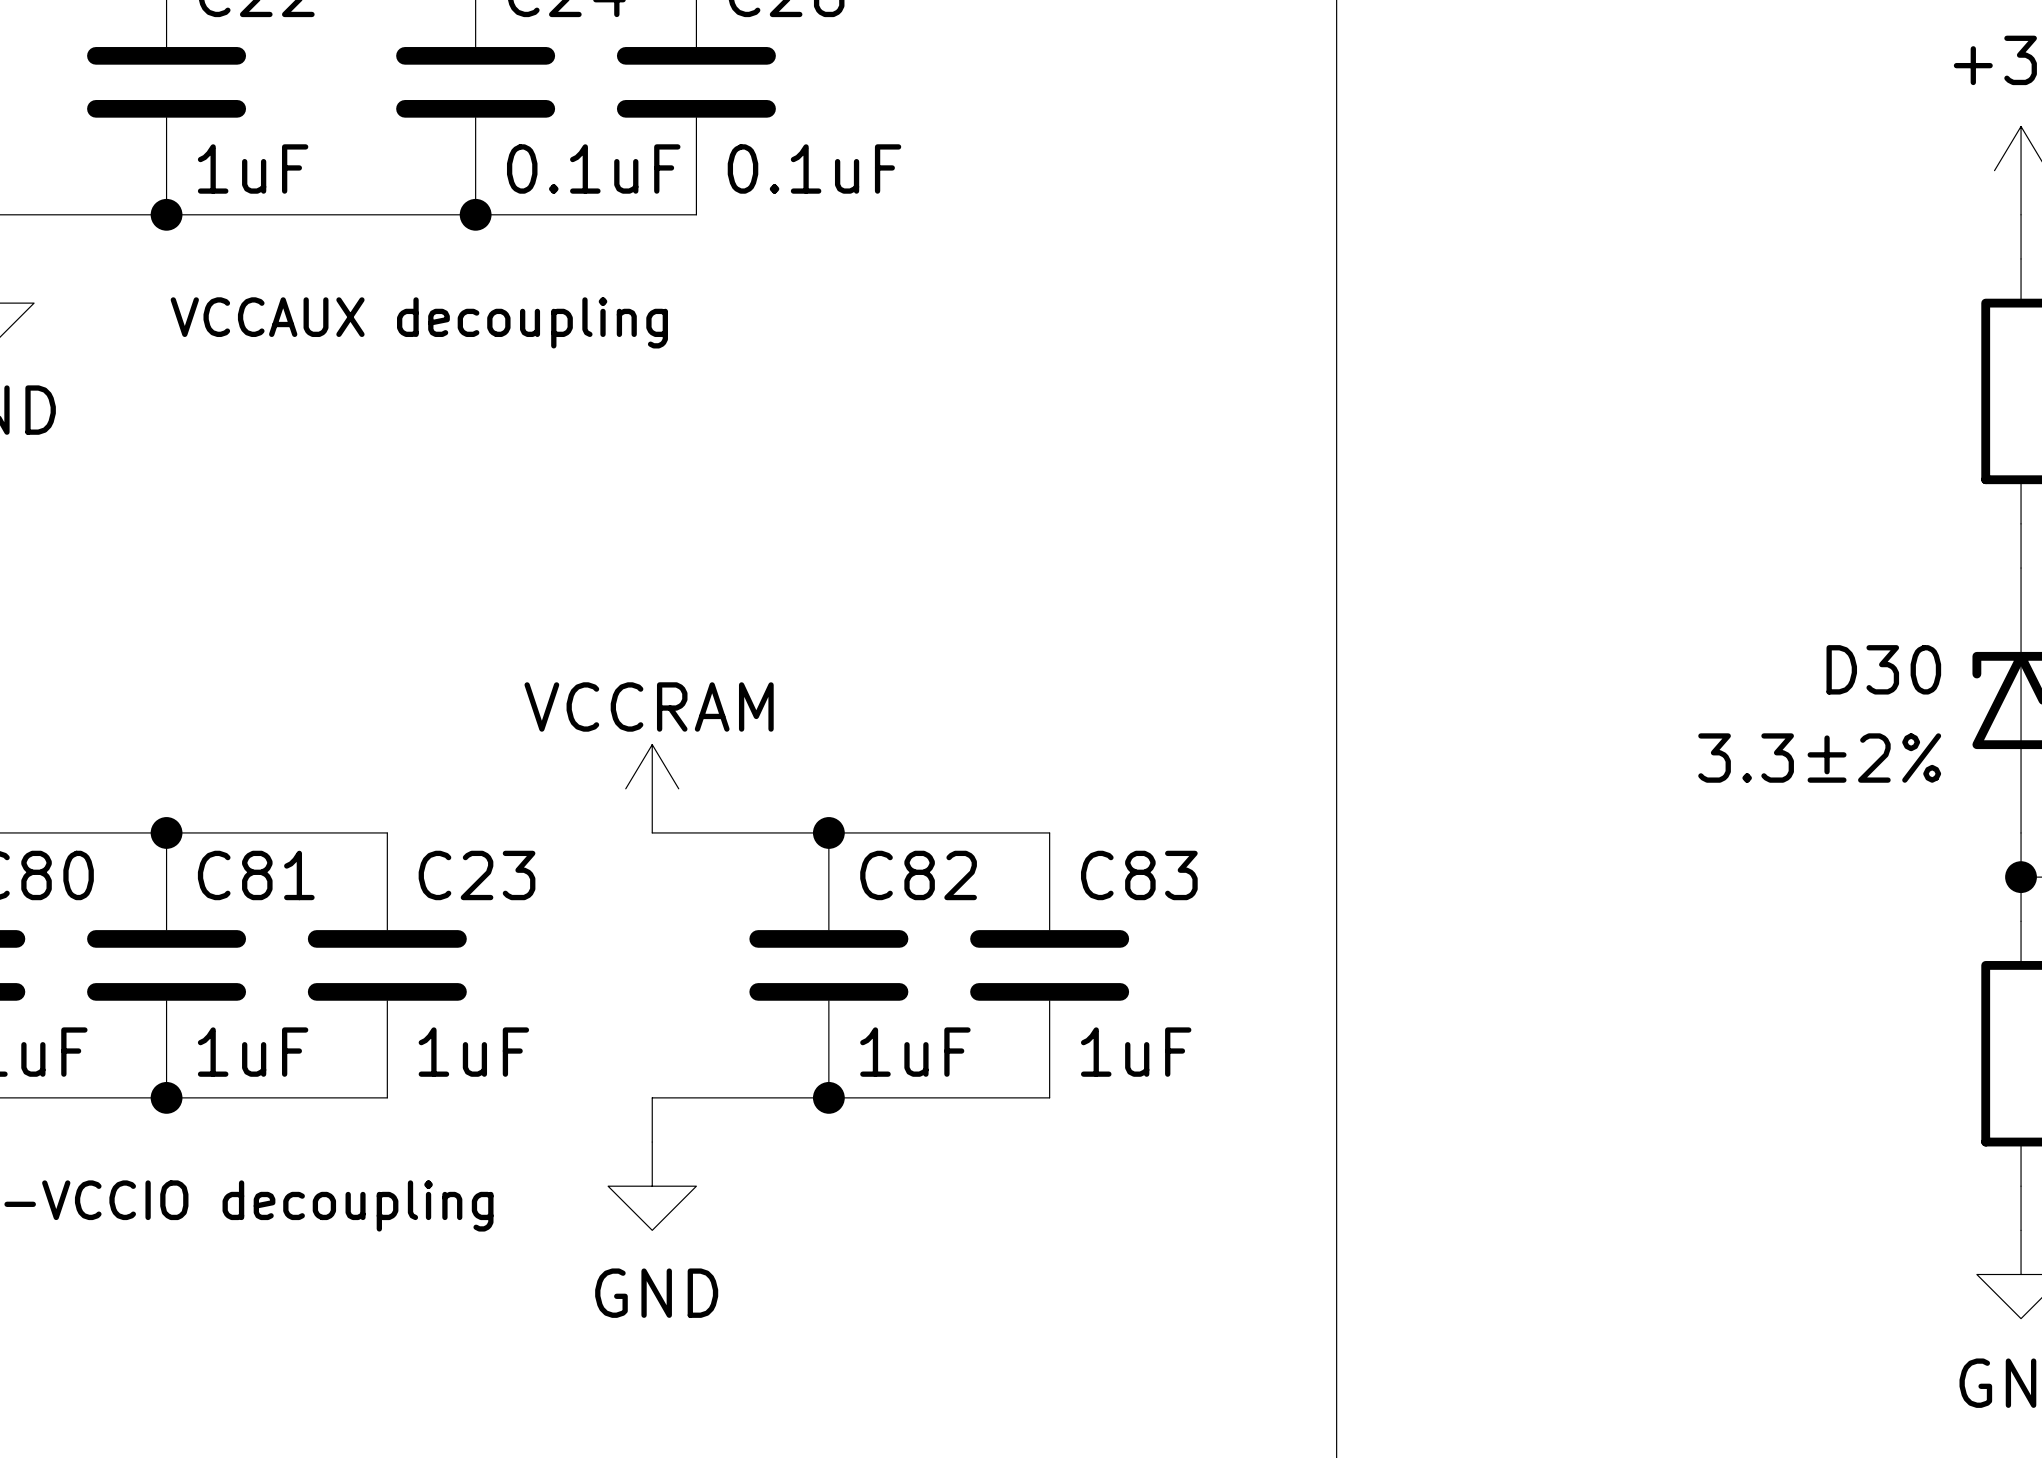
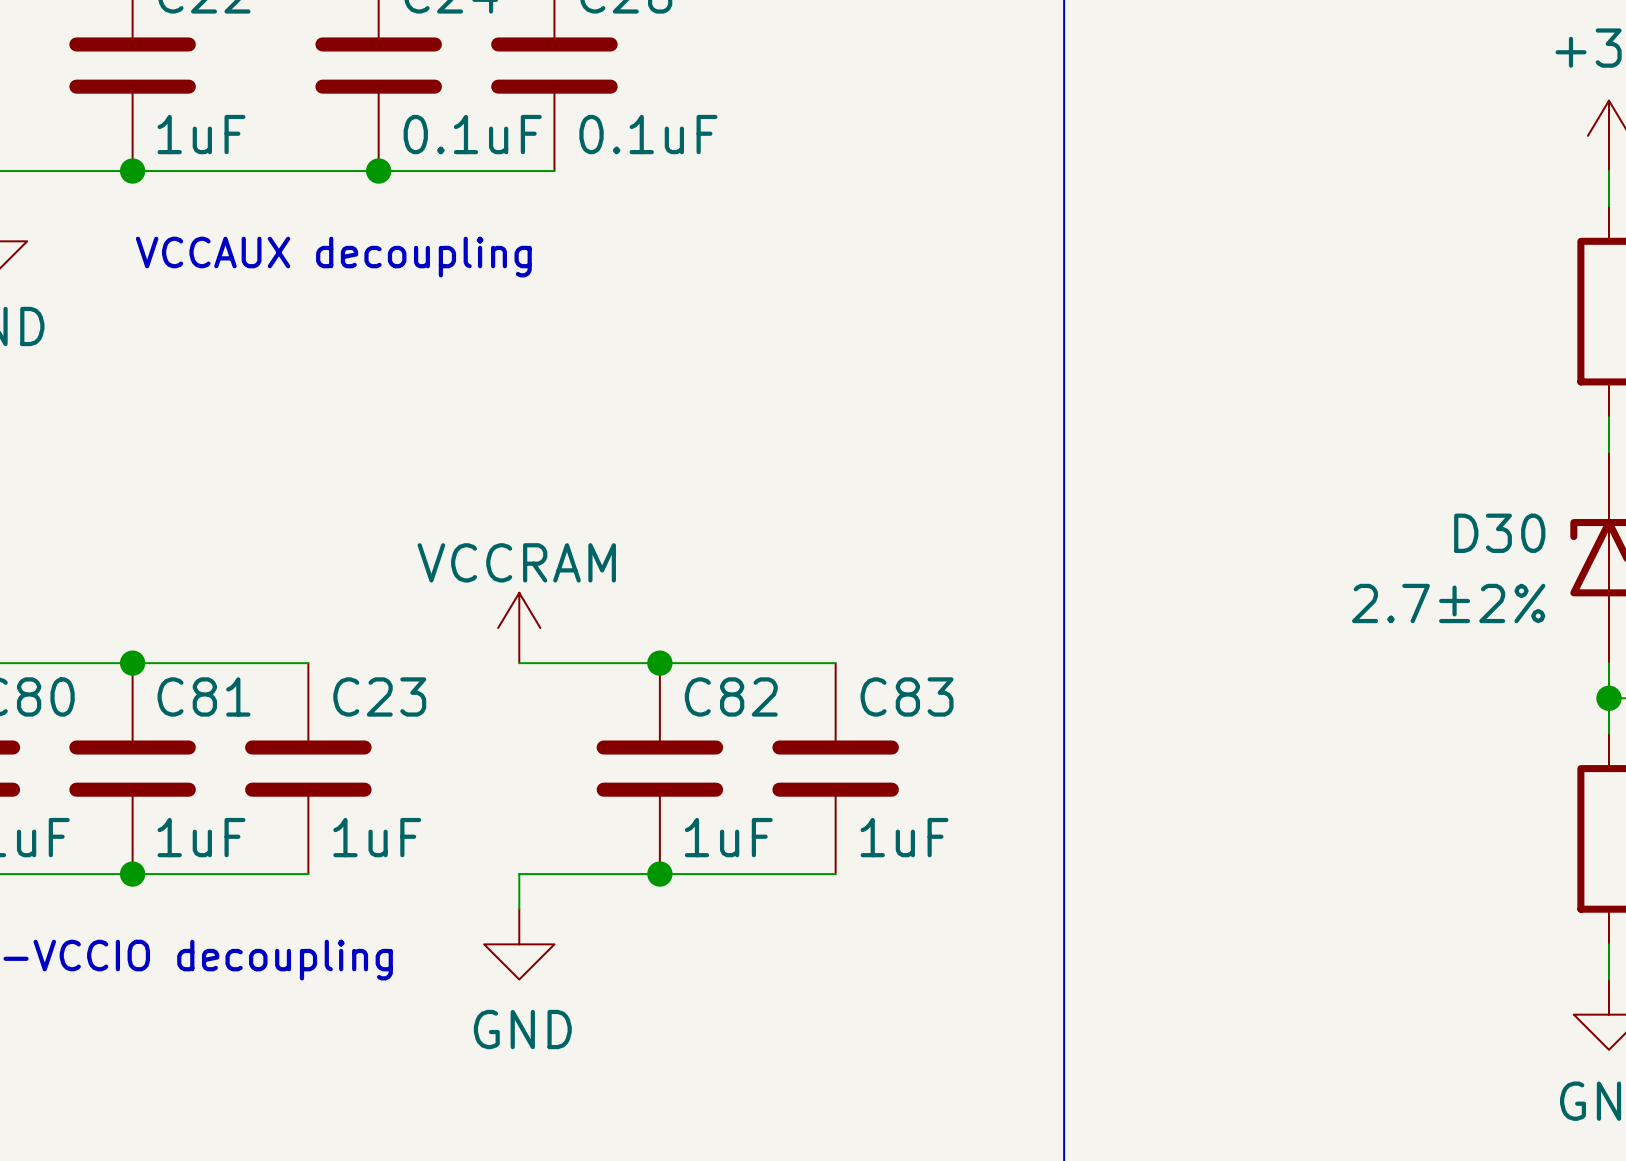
D30 value: 3.3±2% (1819, 758) -> 2.7±2% (1448, 603)

